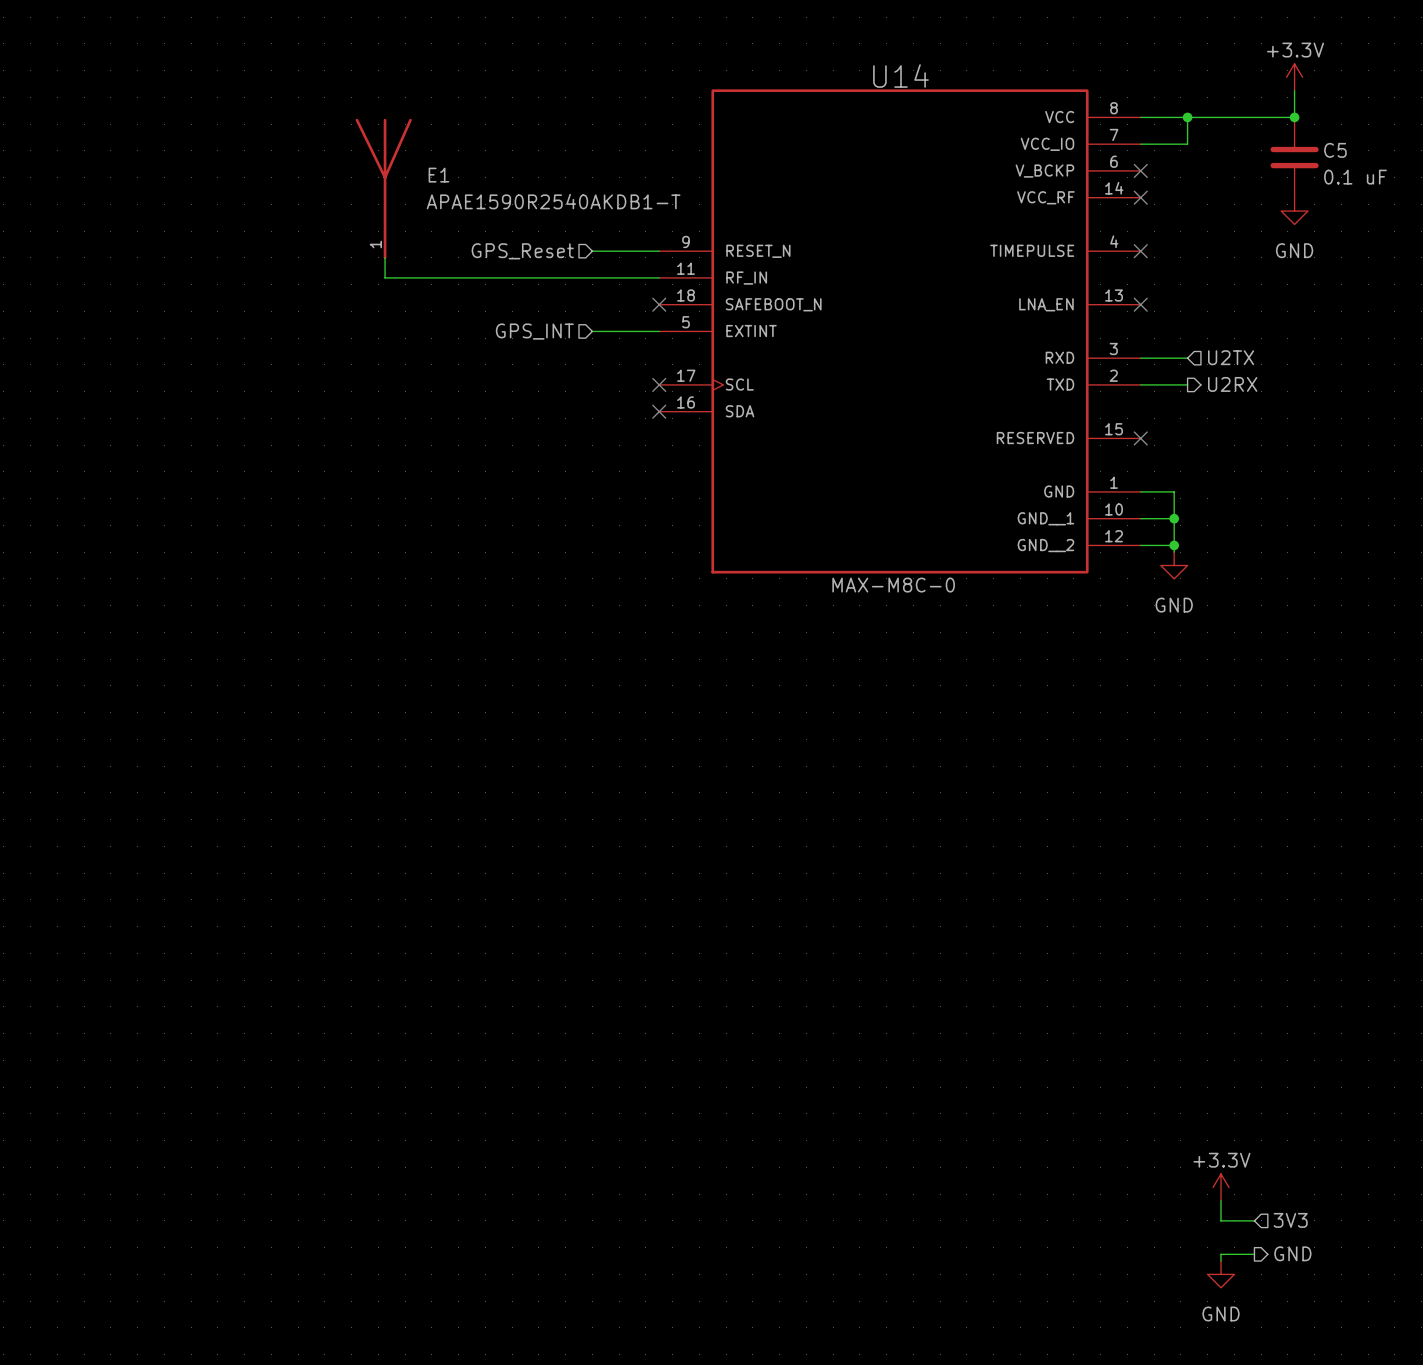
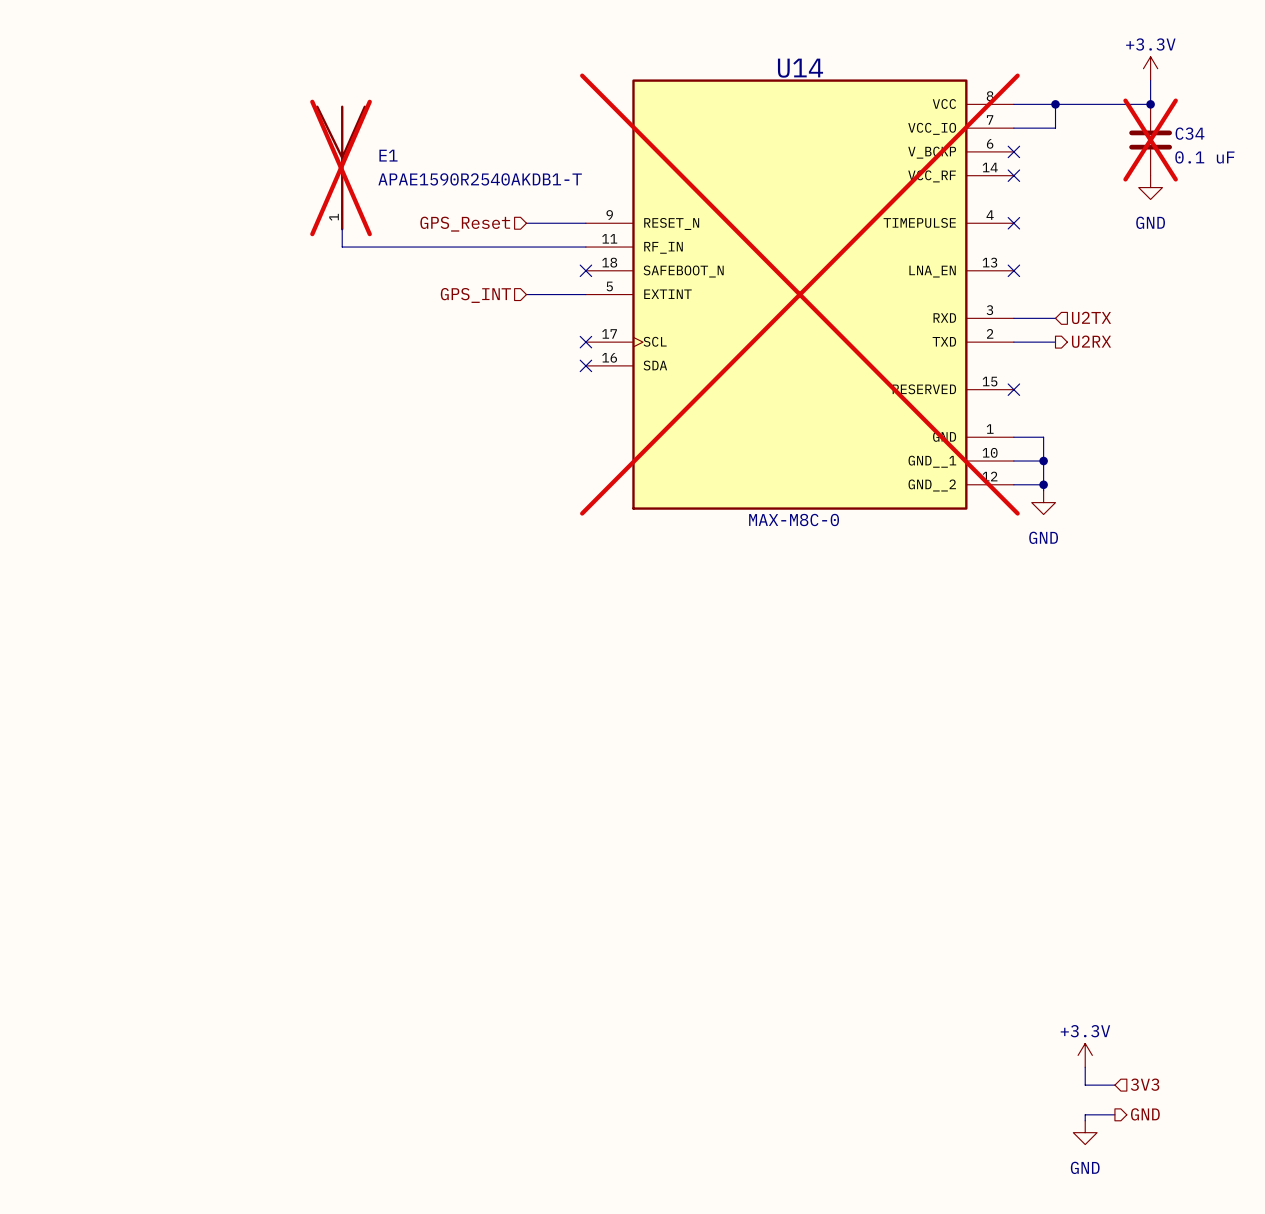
C5 name: C5 (1335, 150) -> C34 (1189, 133)
C5 do-not-place cross: none -> (1150, 140)
E1 do-not-place cross: none -> (341, 167)
U14 do-not-place cross: none -> (799, 294)

